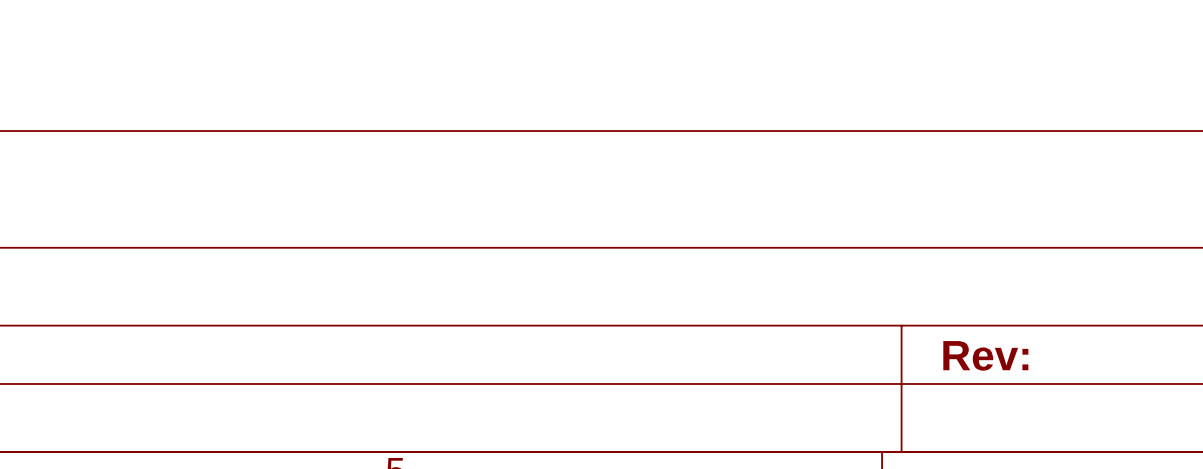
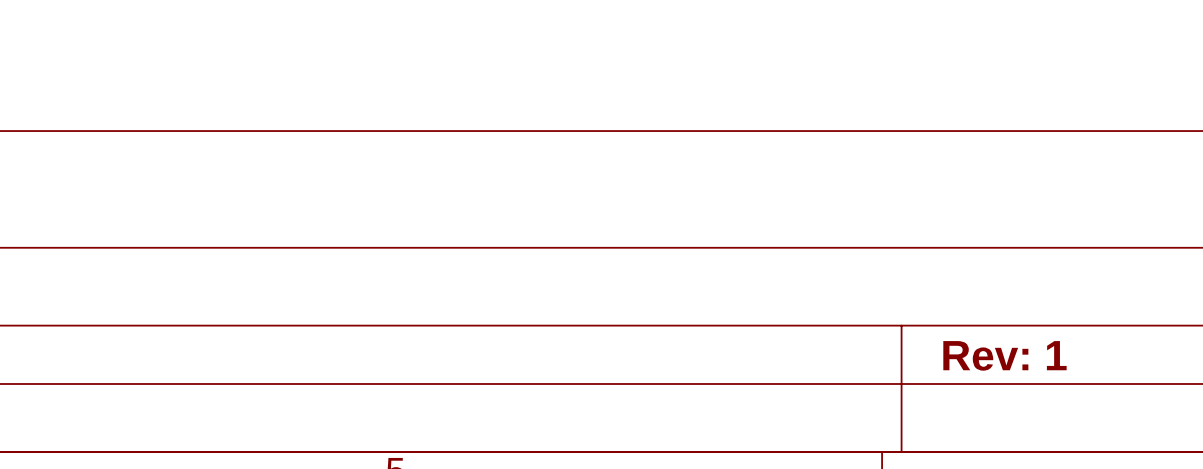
title block: Rev: (985, 355) -> Rev: 1 (1004, 355)

